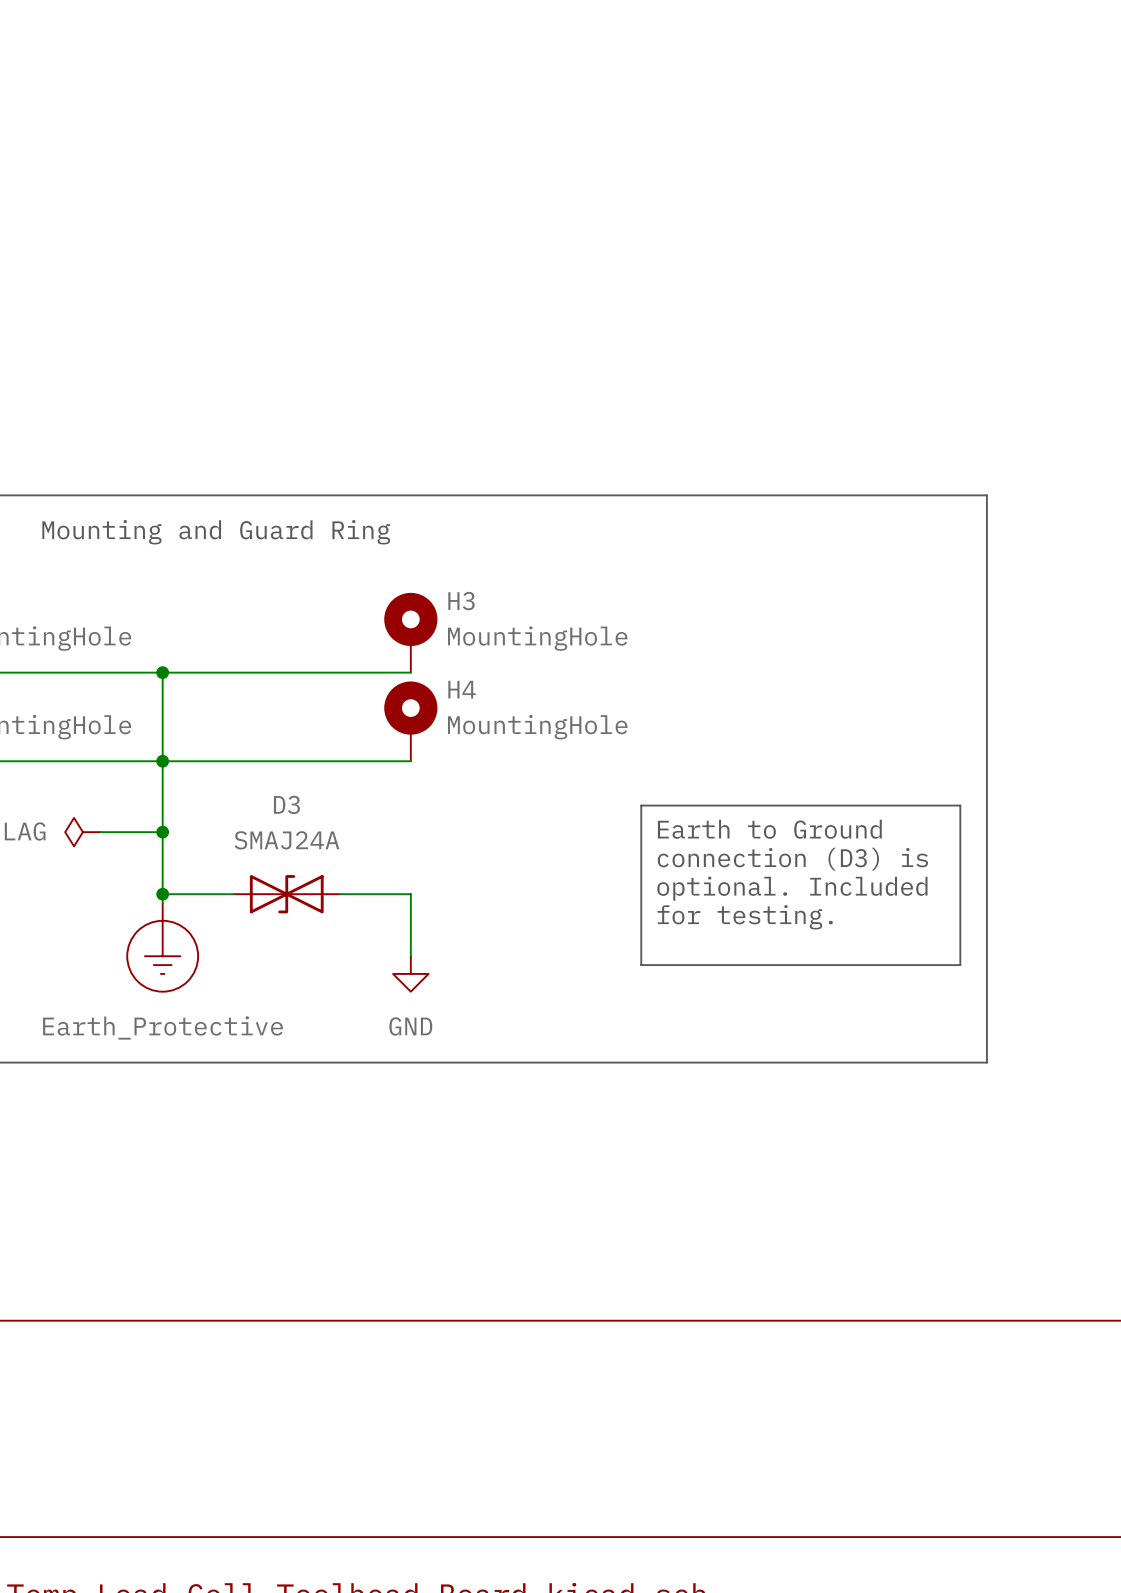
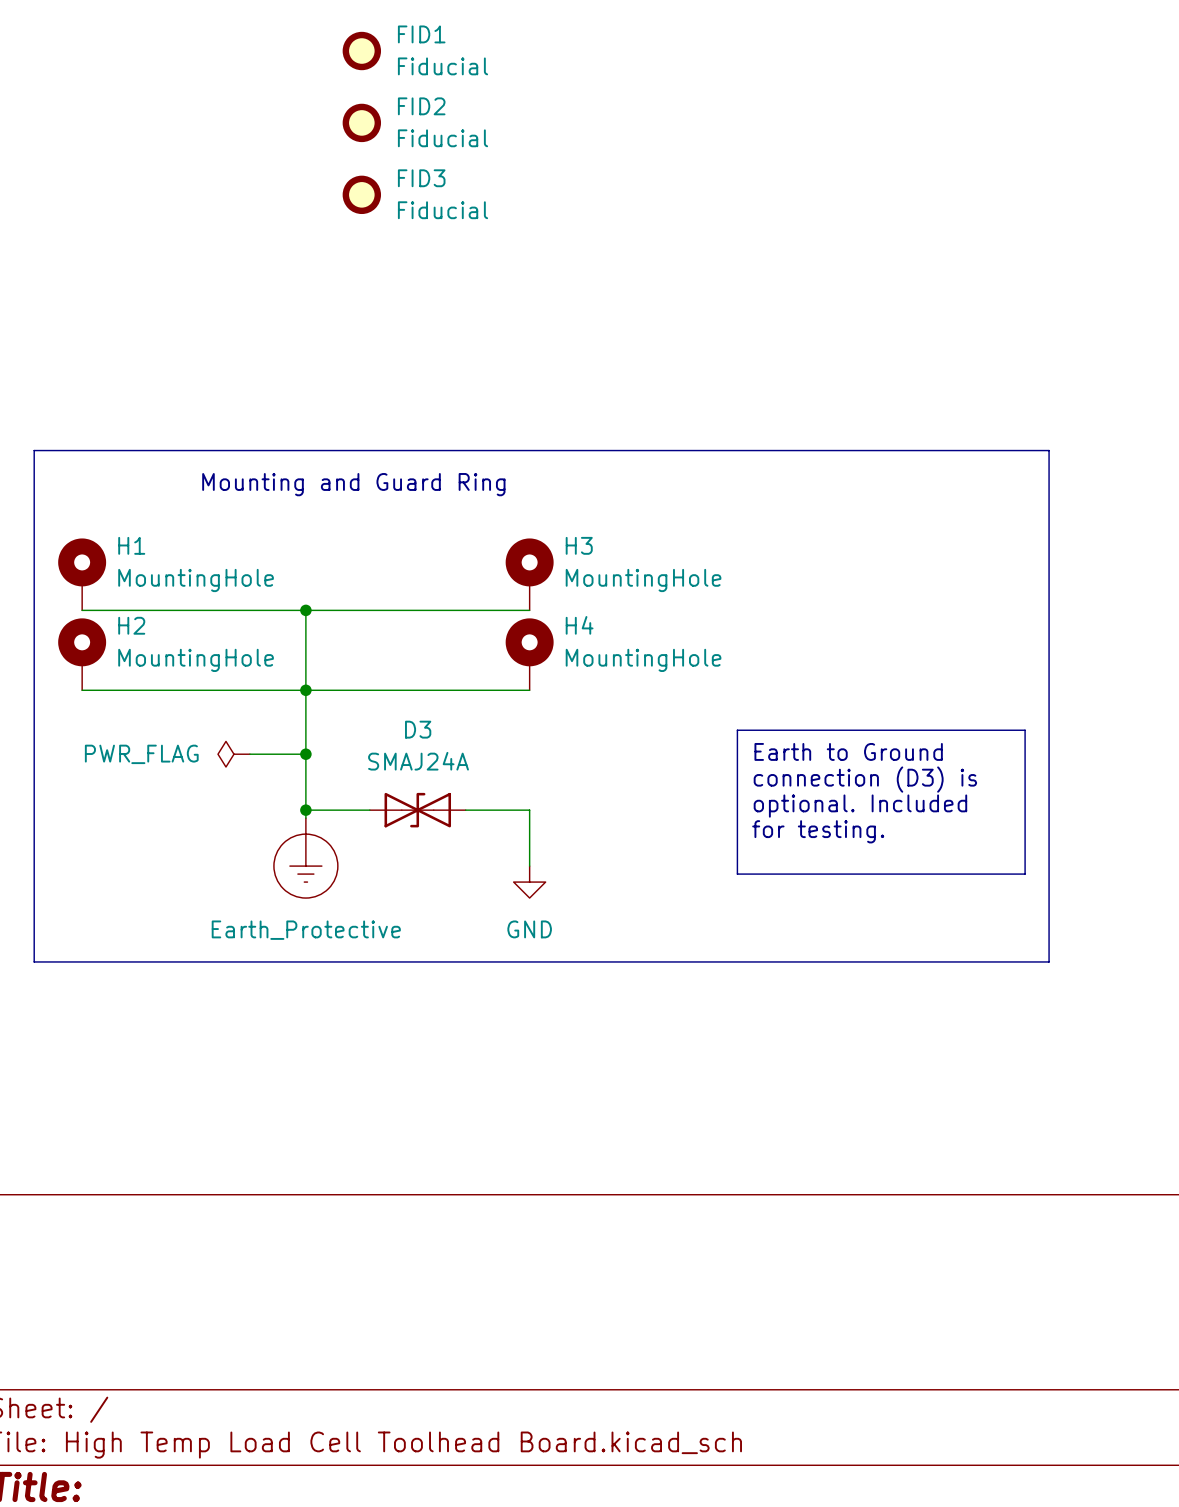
FID1: none -> Fiducial (361, 51)
FID2: none -> Fiducial (361, 122)
FID3: none -> Fiducial (361, 194)

